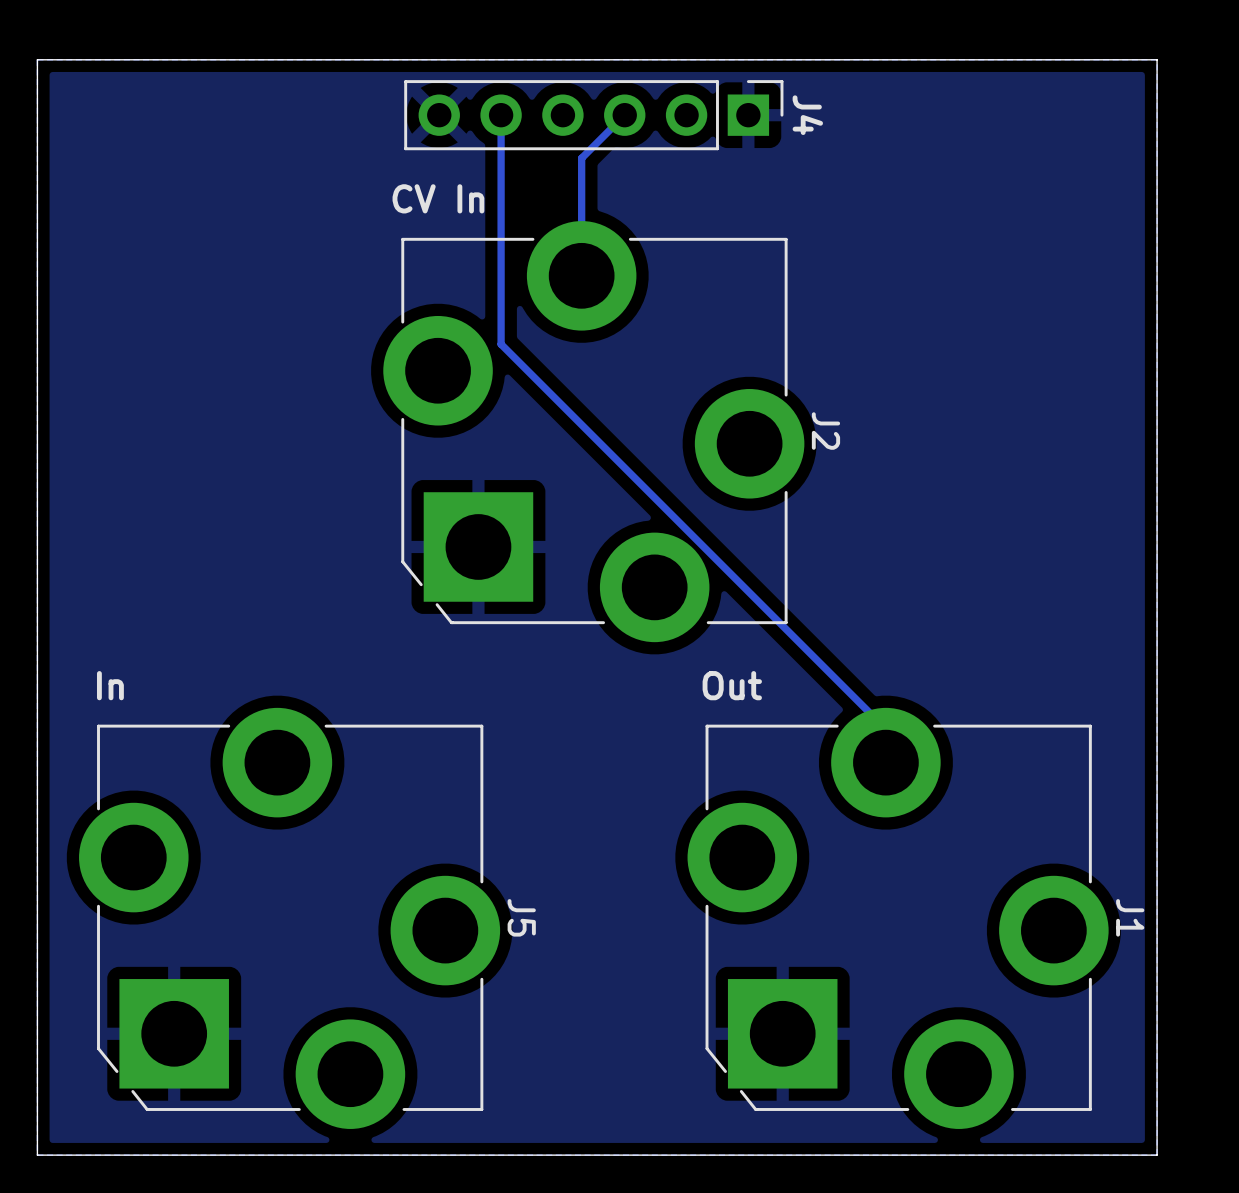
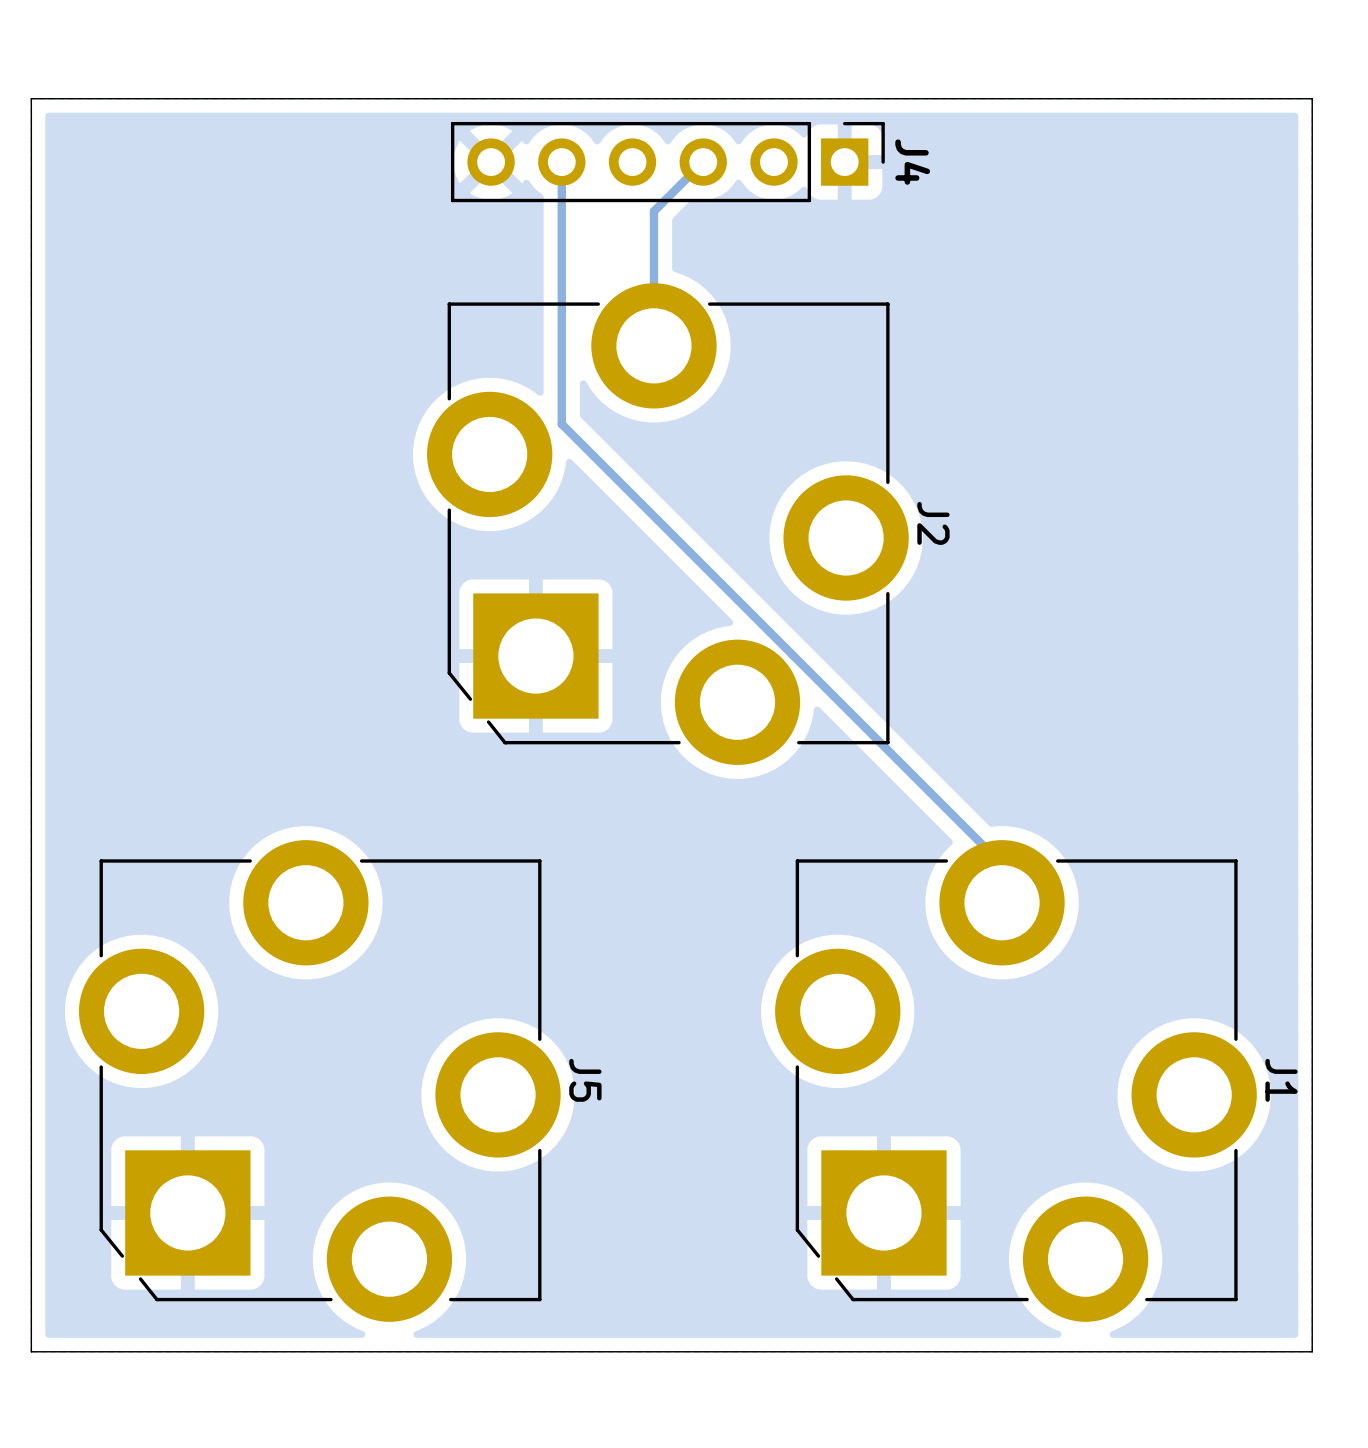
J2 value: CV In (438, 198) -> none
J5 value: In (110, 685) -> none
J1 value: Out (732, 685) -> none

